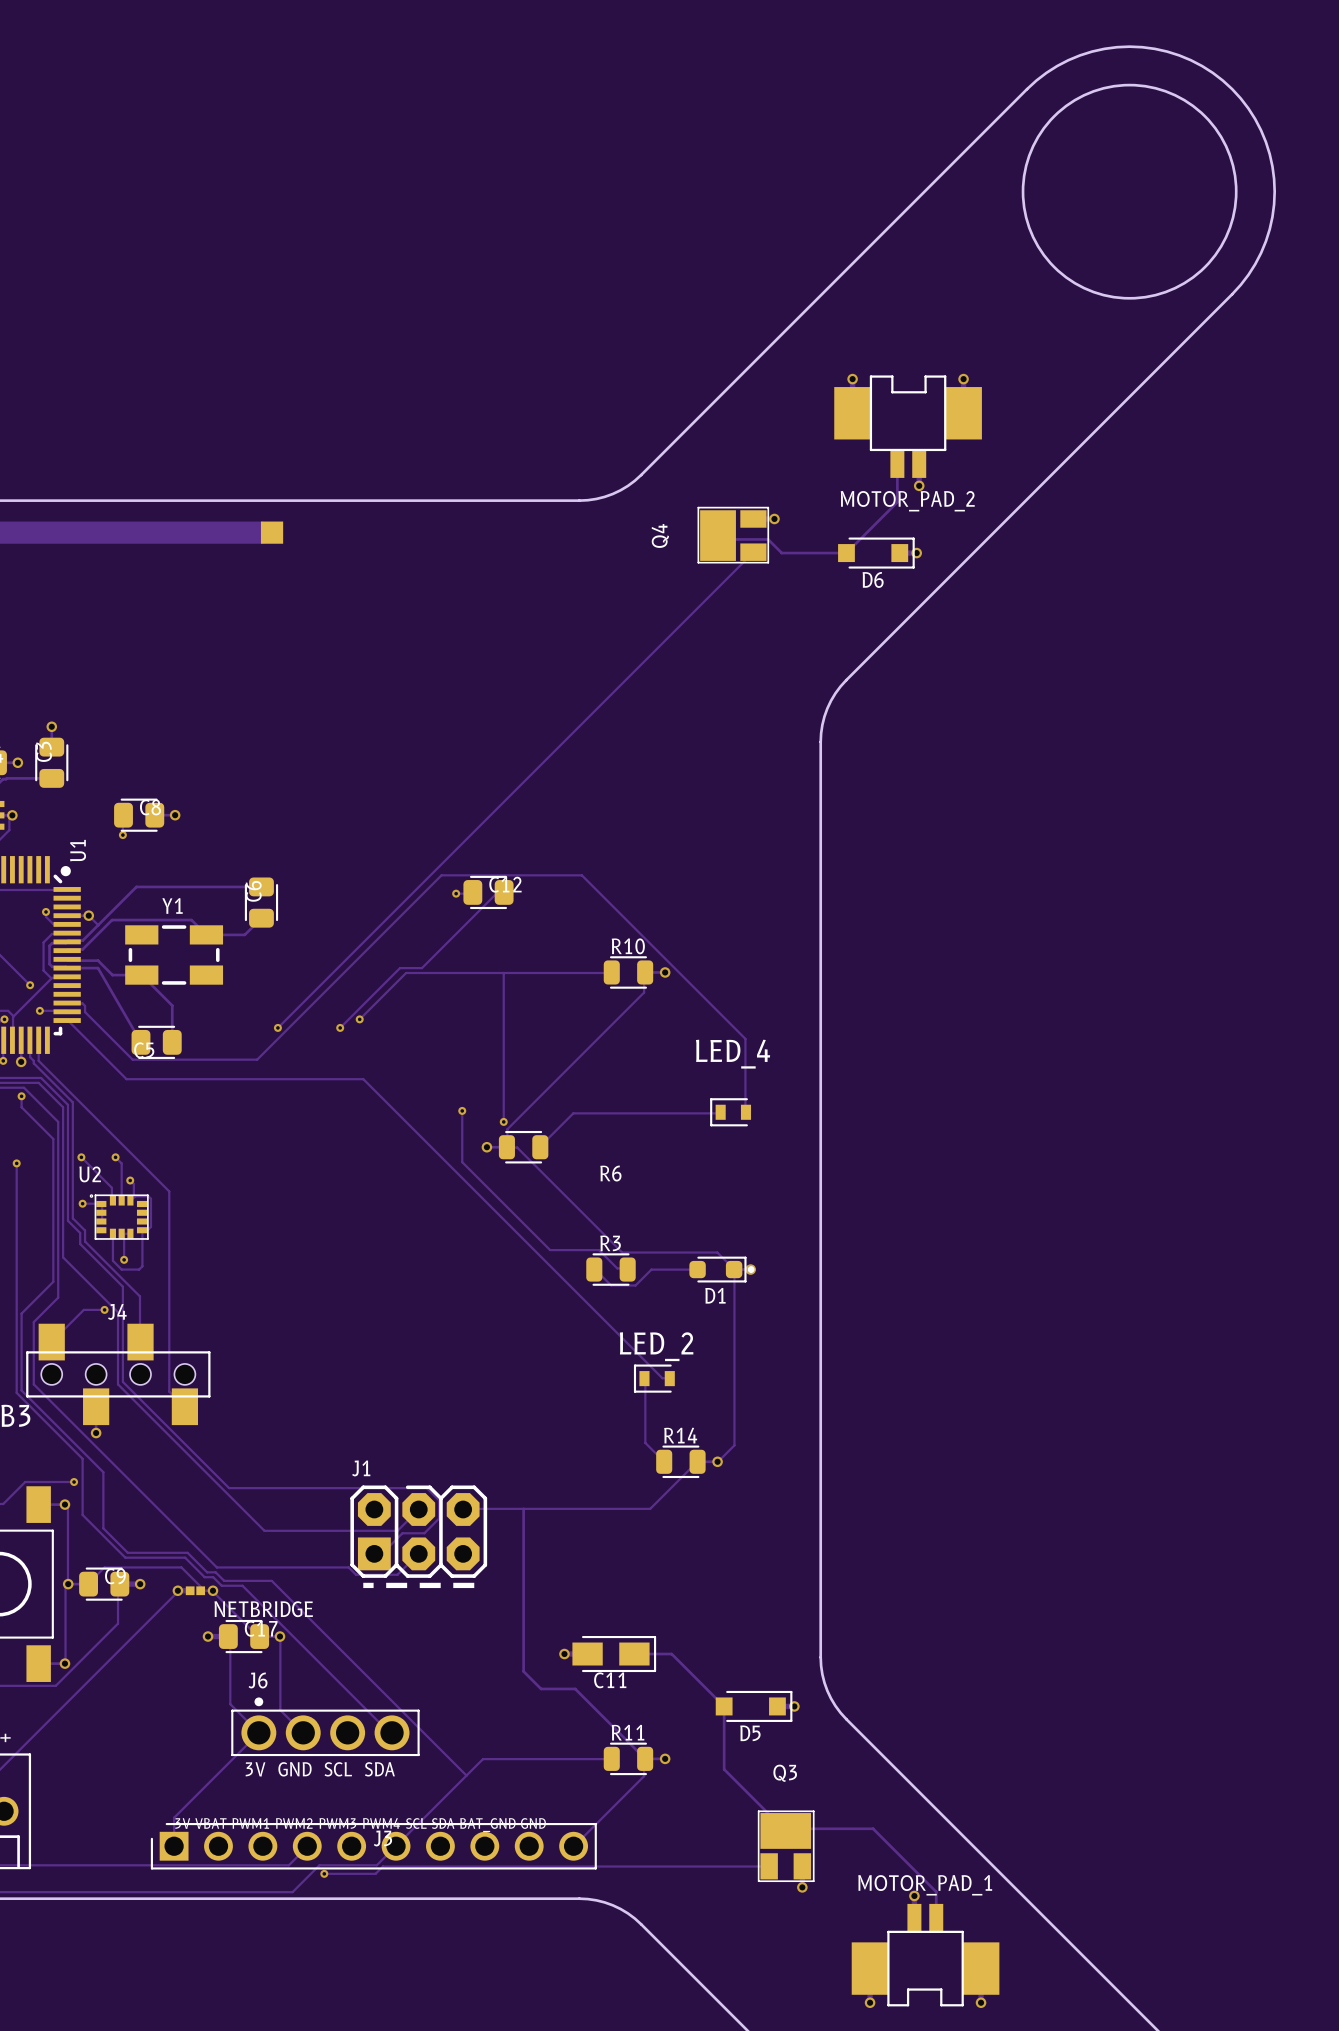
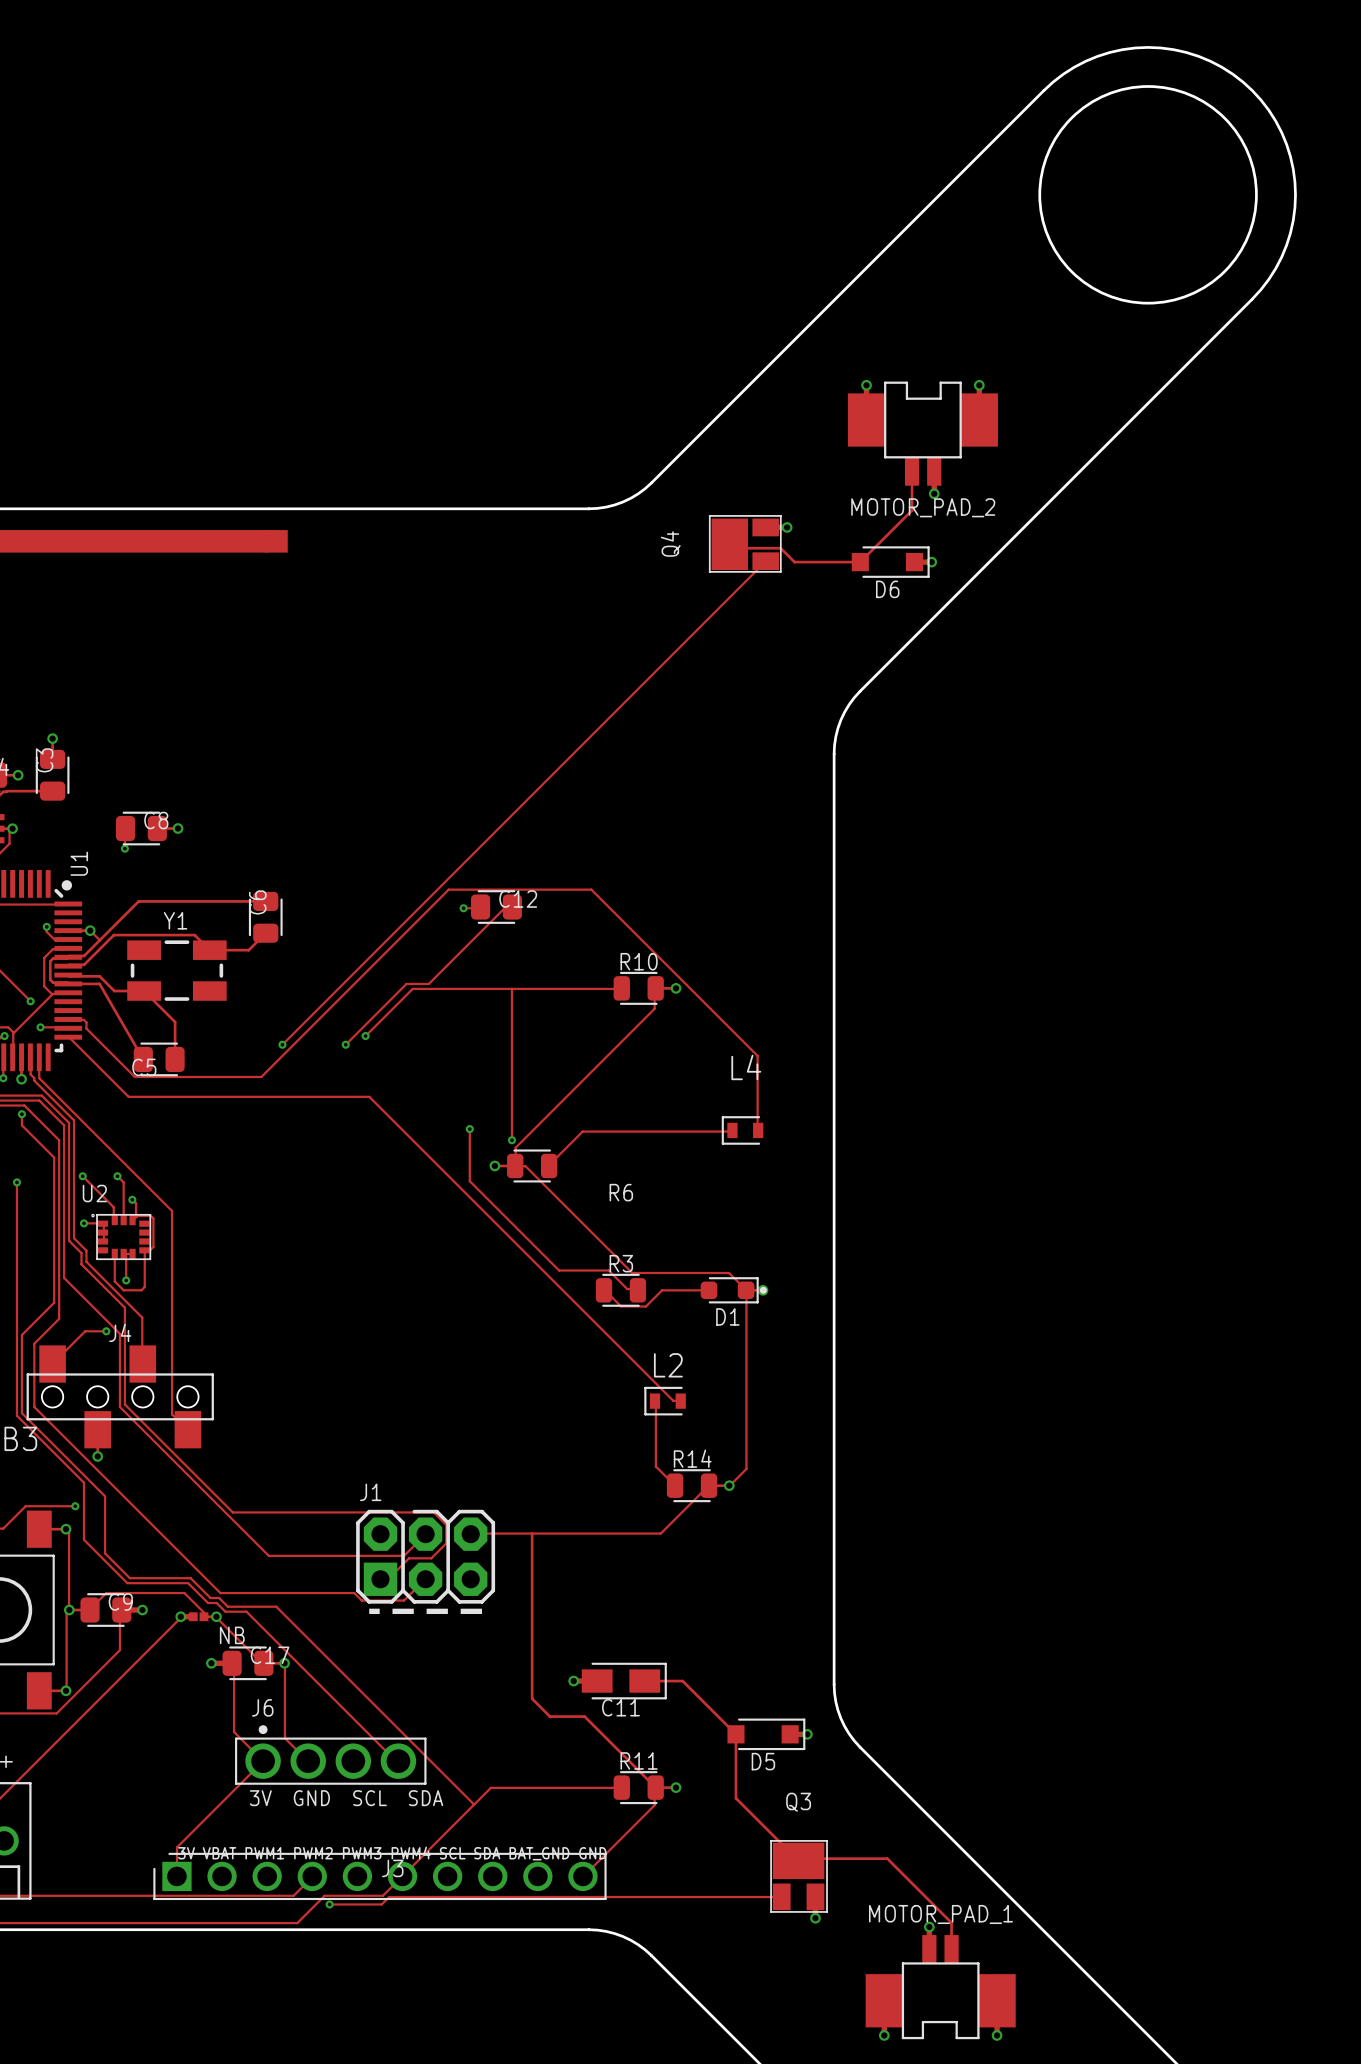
LED_4 name: LED_4 (733, 1054) -> L4 (746, 1067)
LED_2 name: LED_2 (656, 1346) -> L2 (668, 1365)
NETBRIDGE name: NETBRIDGE (263, 1609) -> NB (232, 1635)

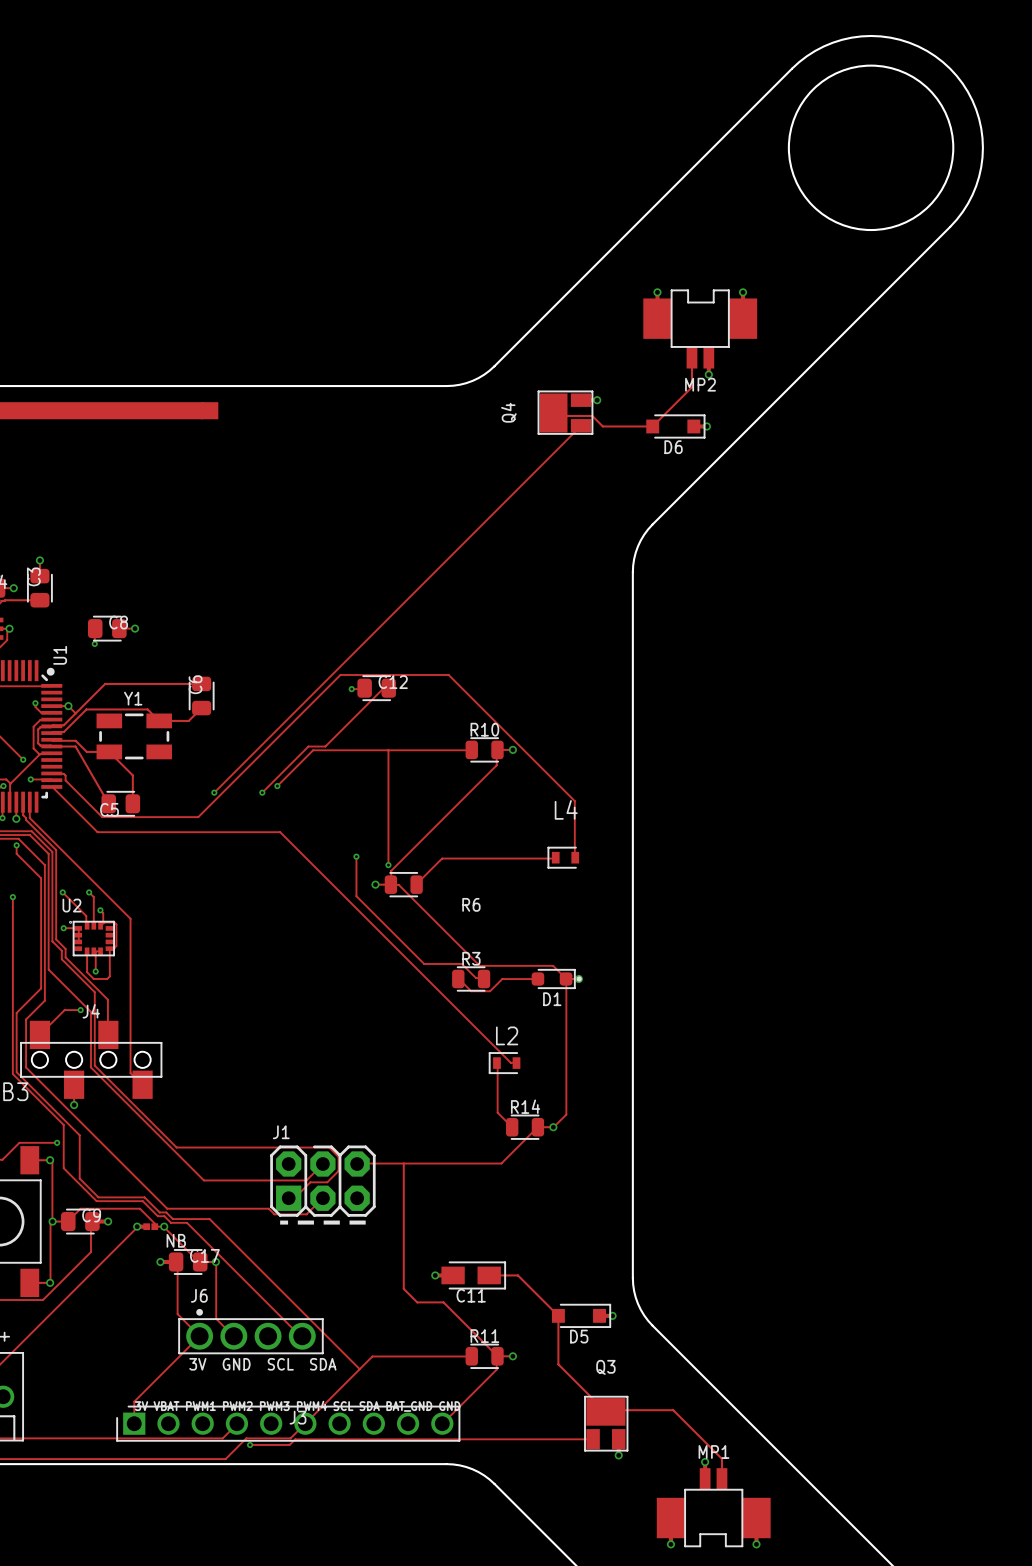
MOTOR_PAD_2 name: MOTOR_PAD_2 (923, 507) -> MP2 (700, 384)
MOTOR_PAD_1 name: MOTOR_PAD_1 (941, 1914) -> MP1 (713, 1451)

